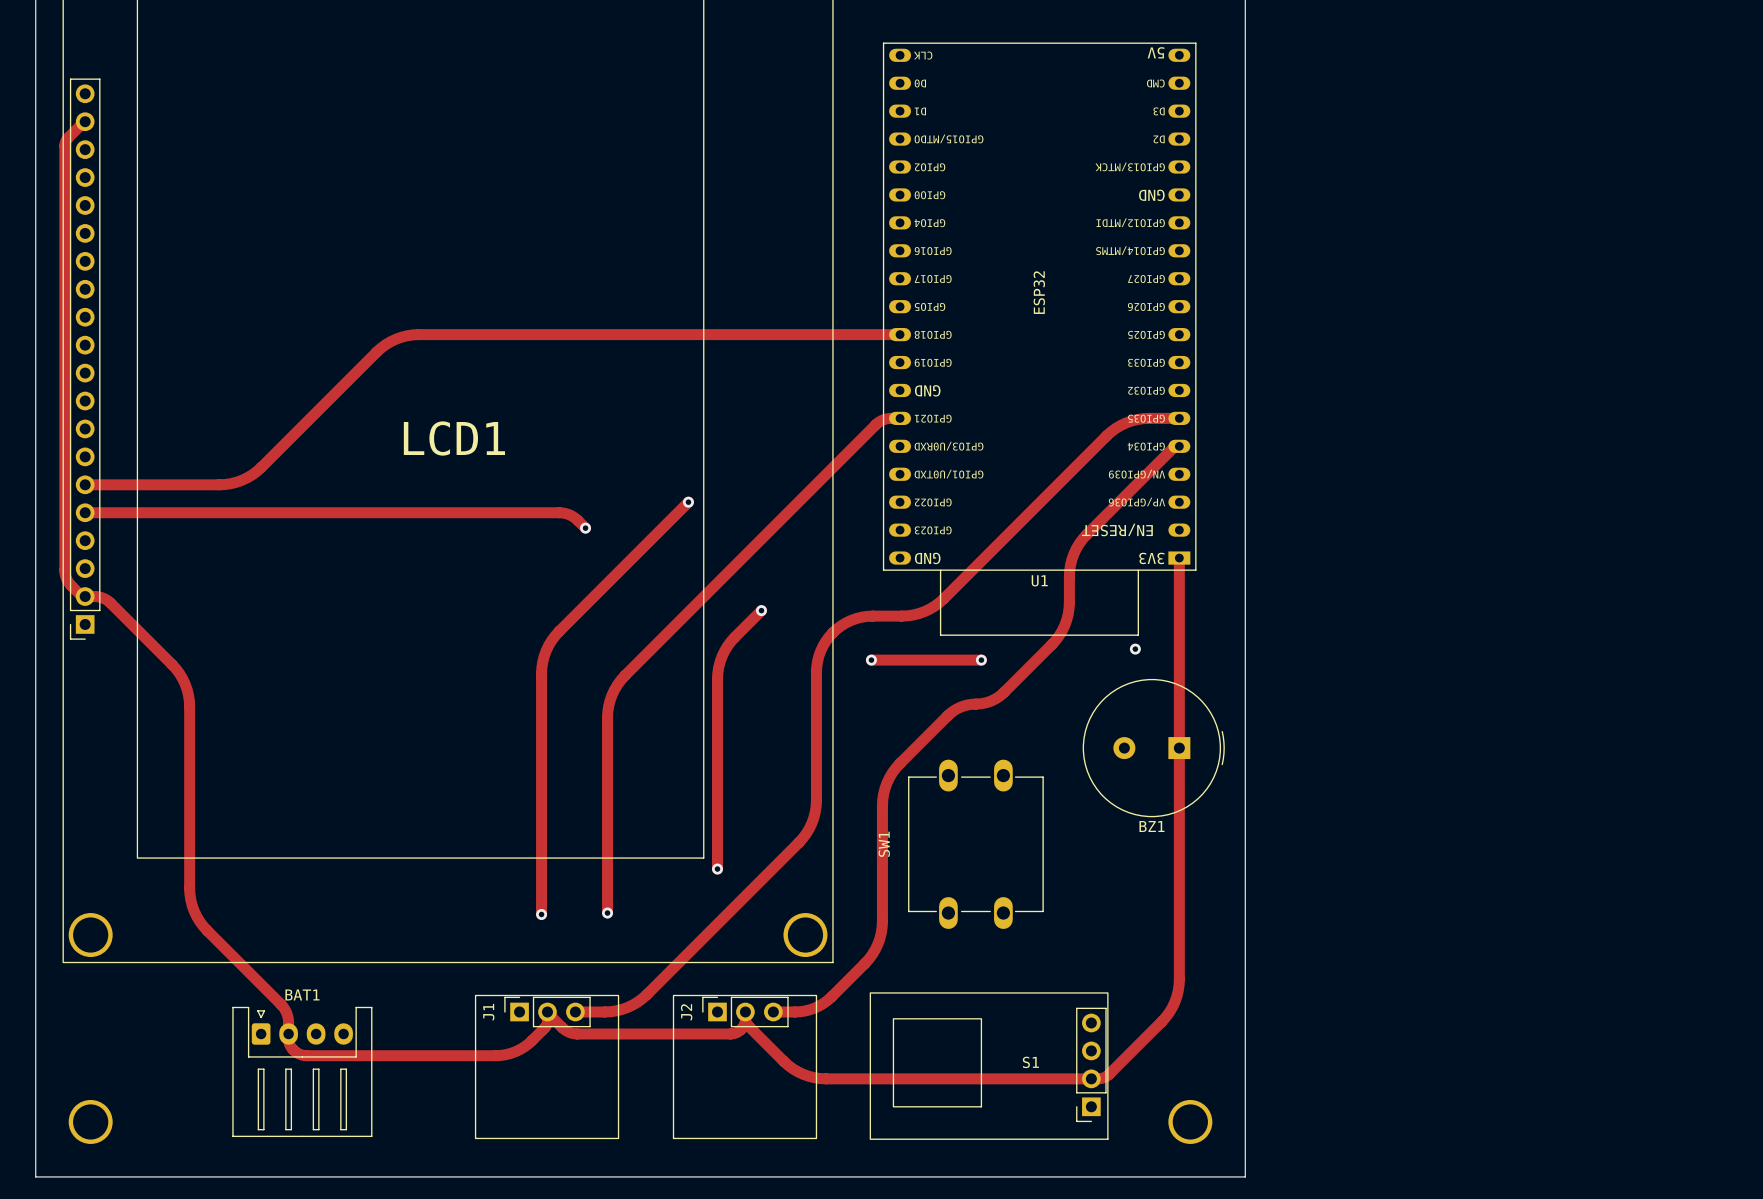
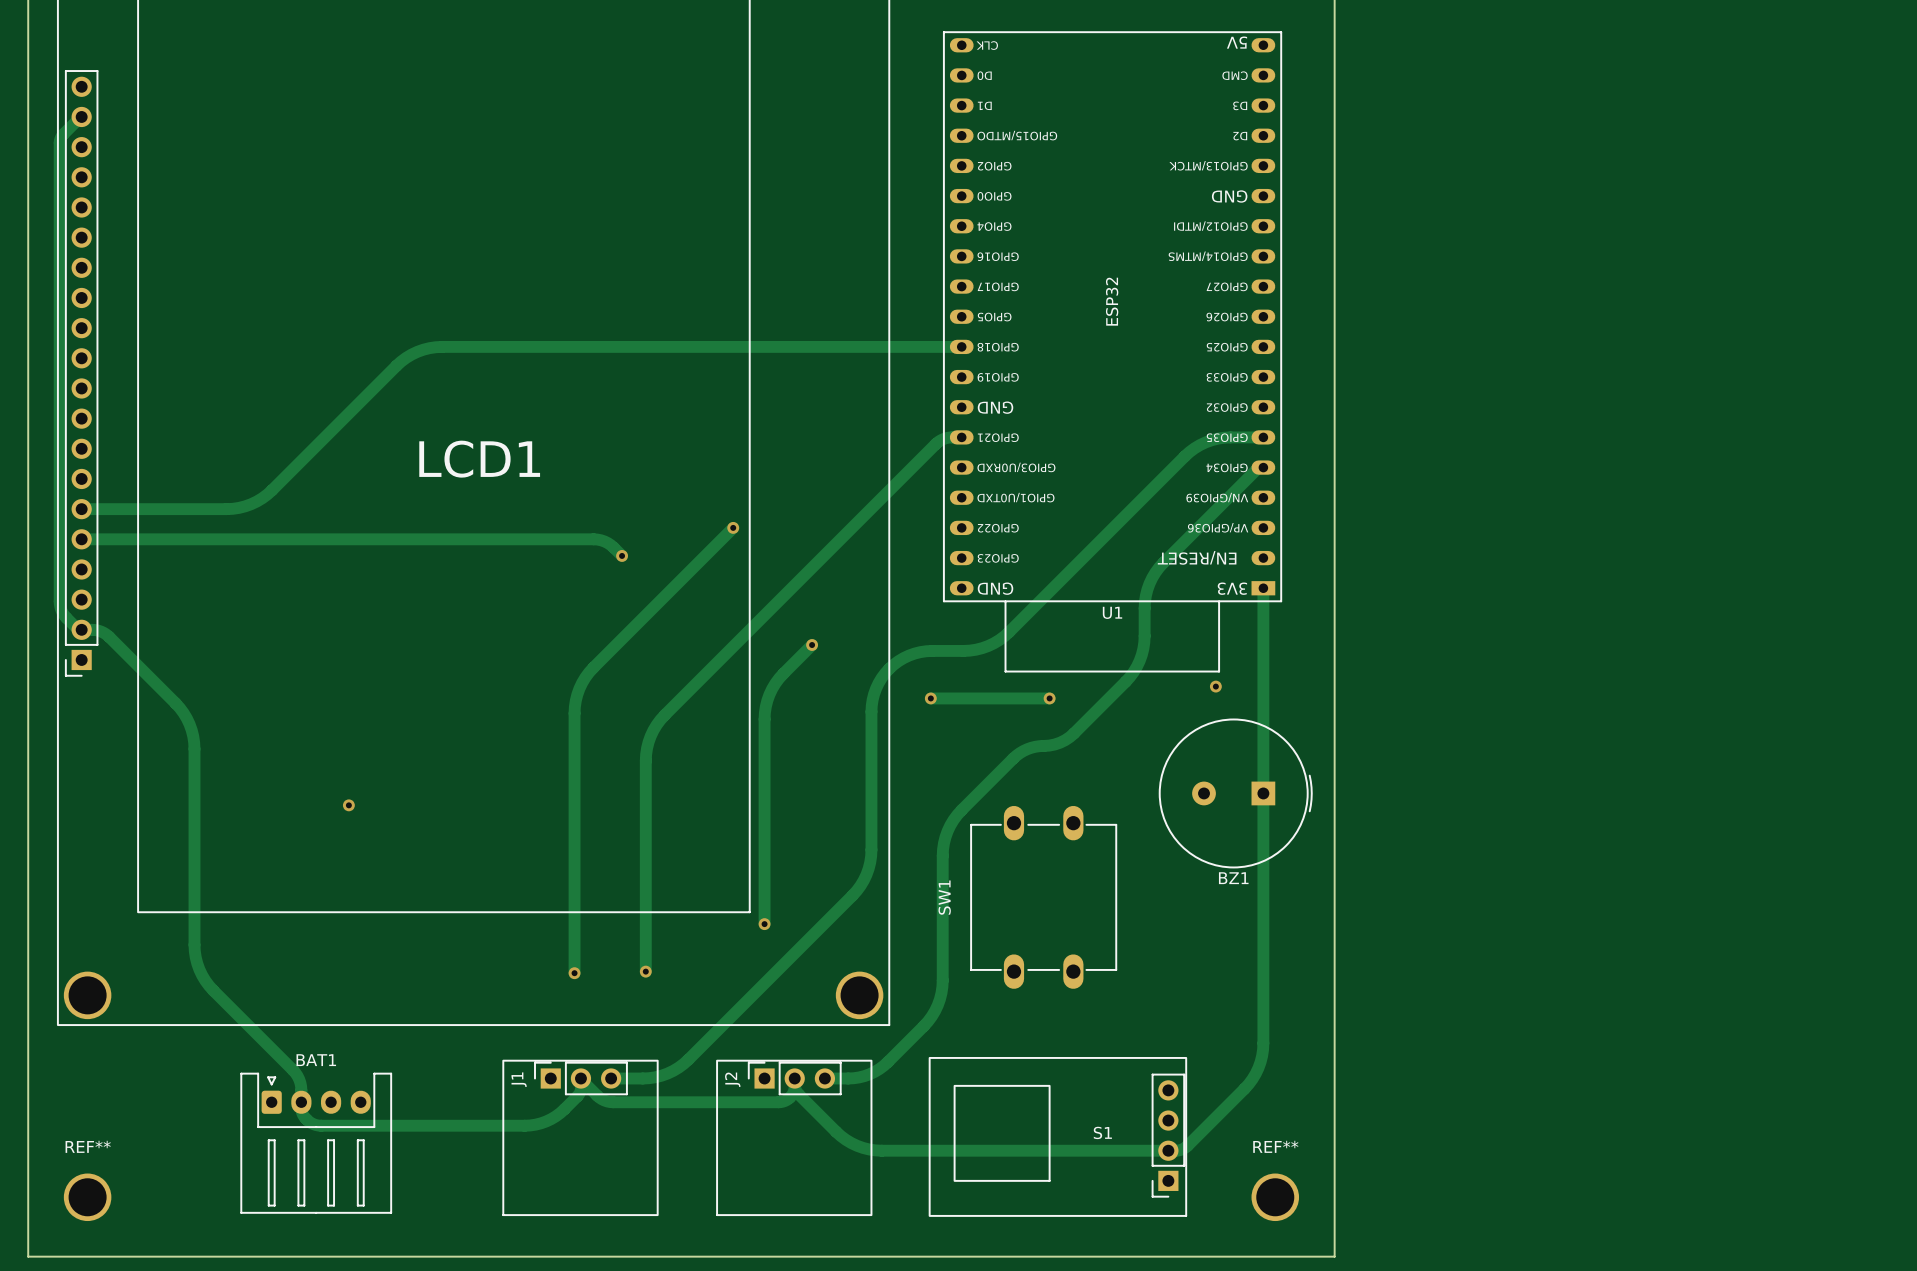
via: none -> (348, 805)
REF** name: none -> REF** (88, 1146)
REF** name: none -> REF** (1275, 1146)

